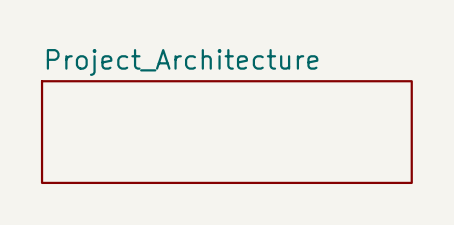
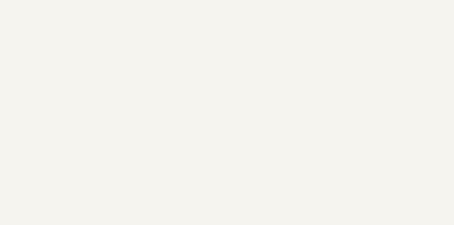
sheet Project_Architecture: (226, 132) -> none

